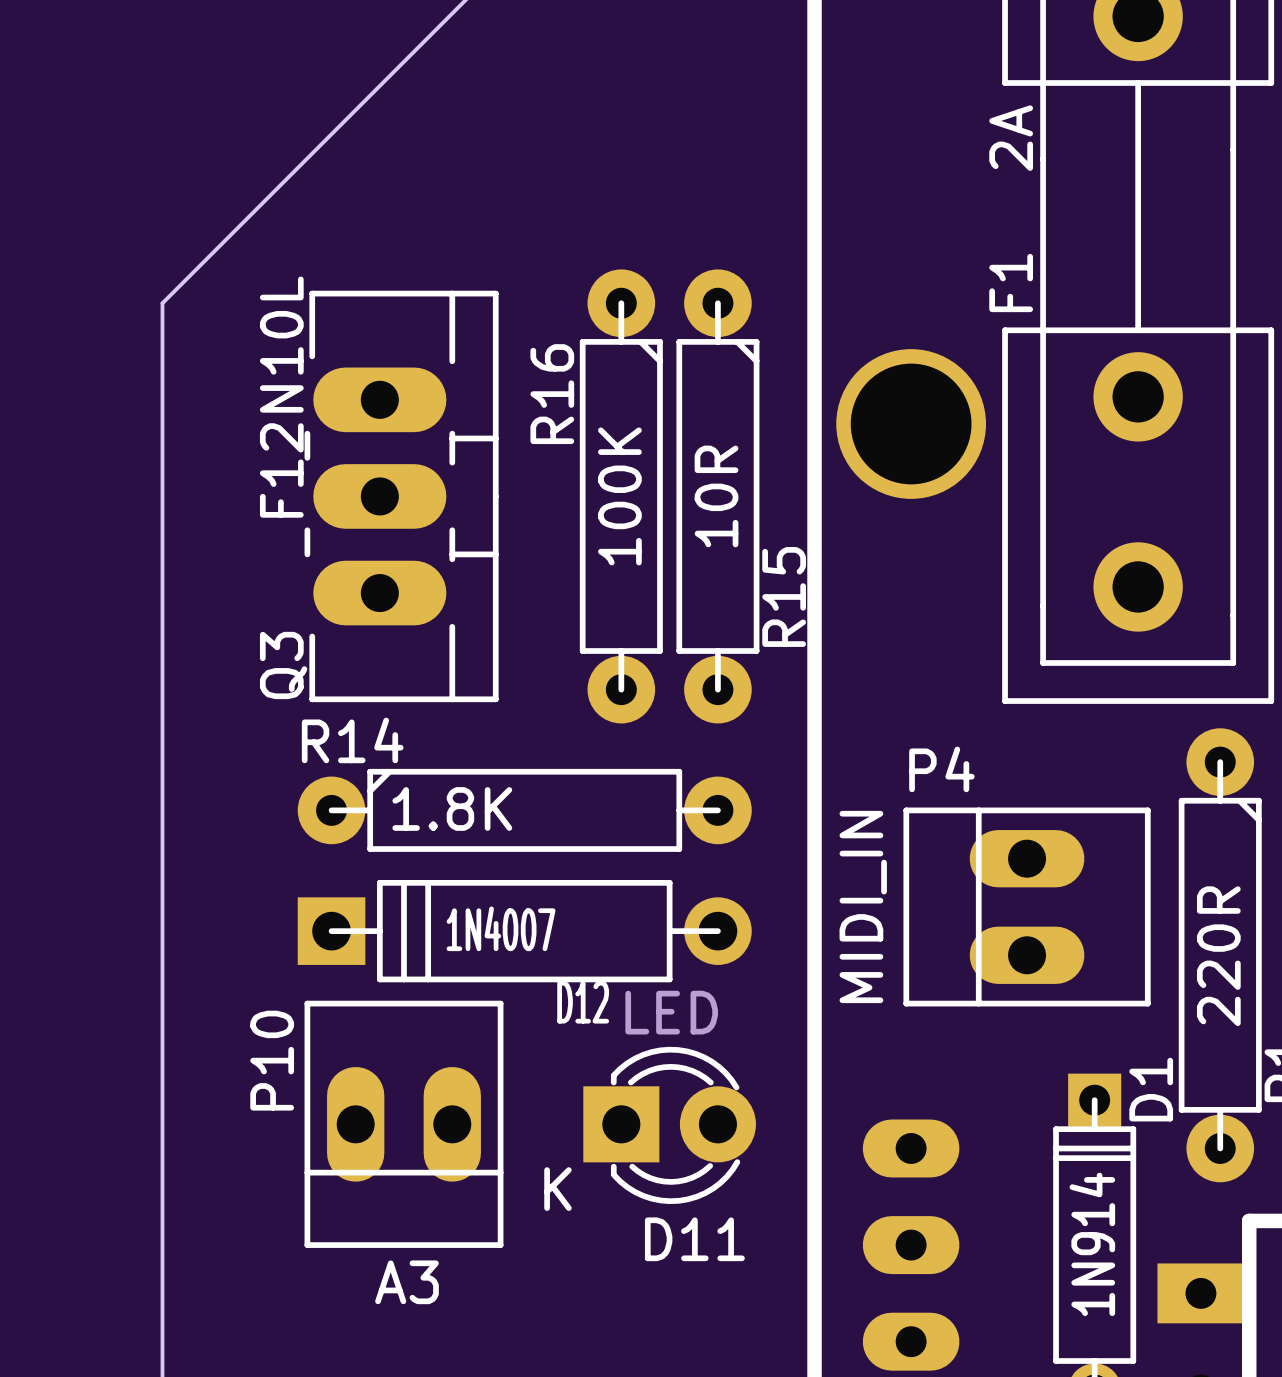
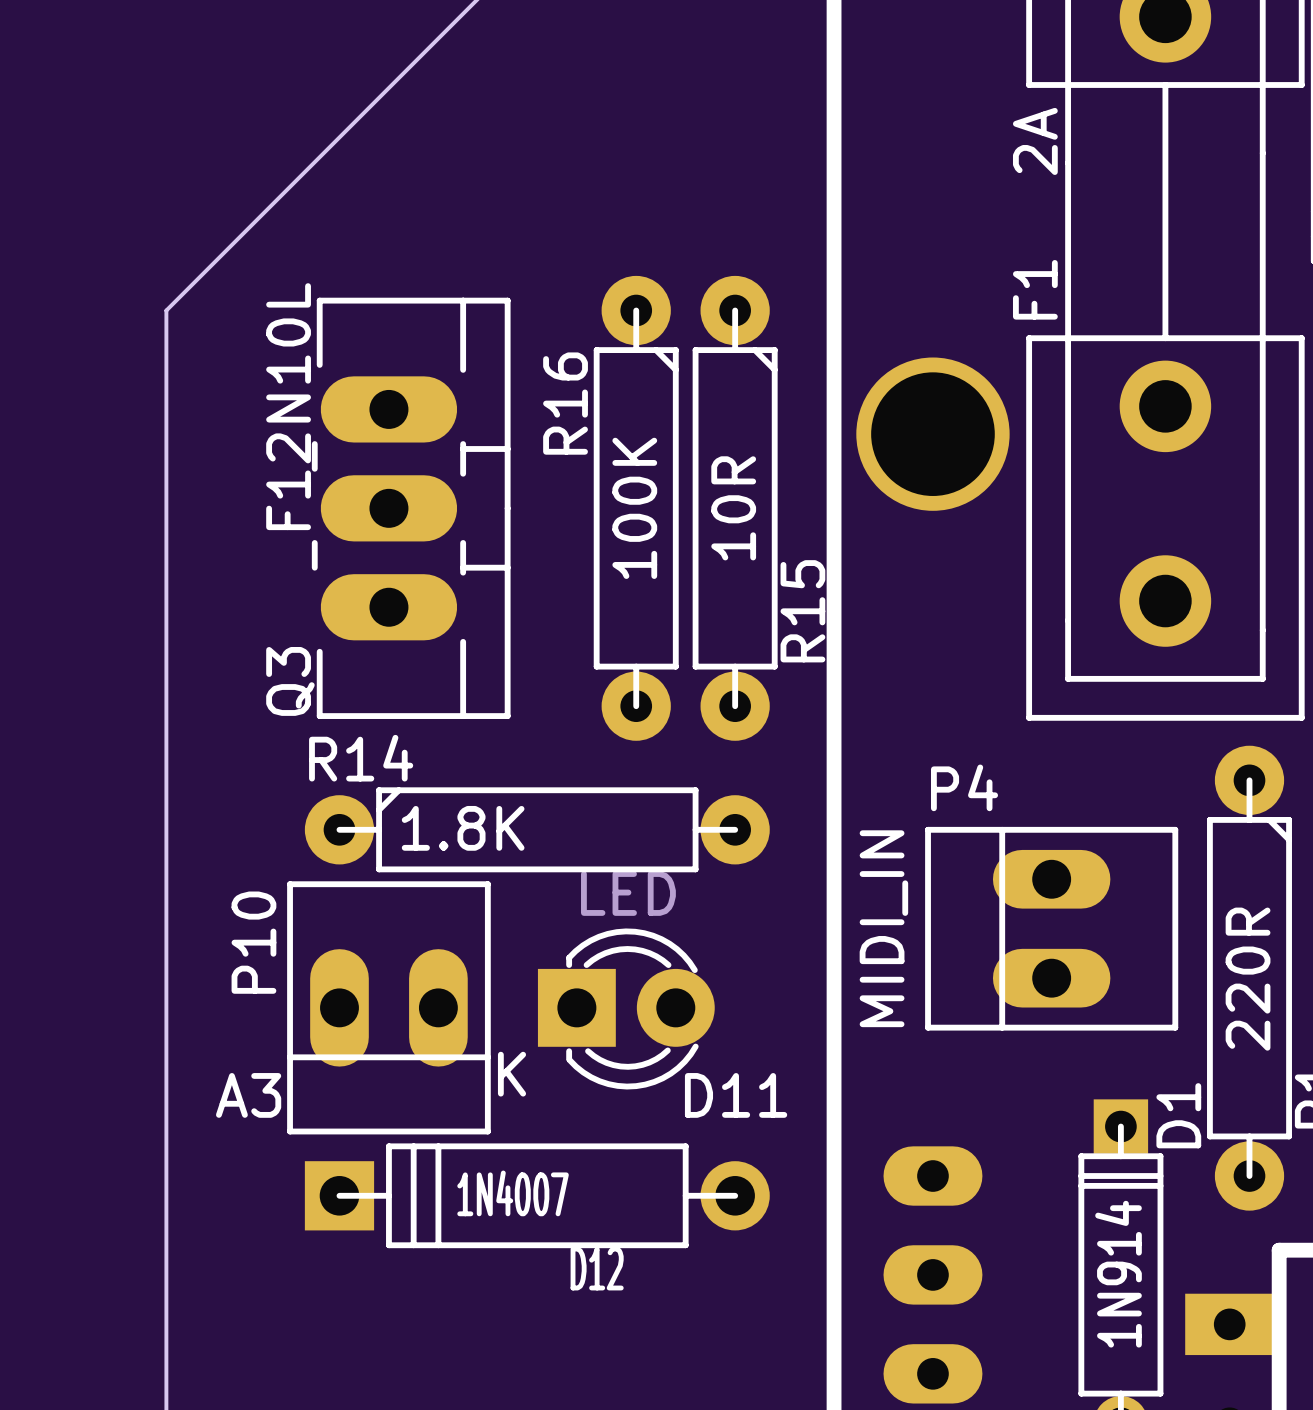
D12 position: (524, 931) -> (537, 1195)
P10 position: (403, 1124) -> (388, 1007)
D11 position: (669, 1125) -> (626, 1008)
D11 name position: D11 (694, 1239) -> D11 (736, 1095)
P10 value position: A3 (407, 1282) -> A3 (248, 1095)

